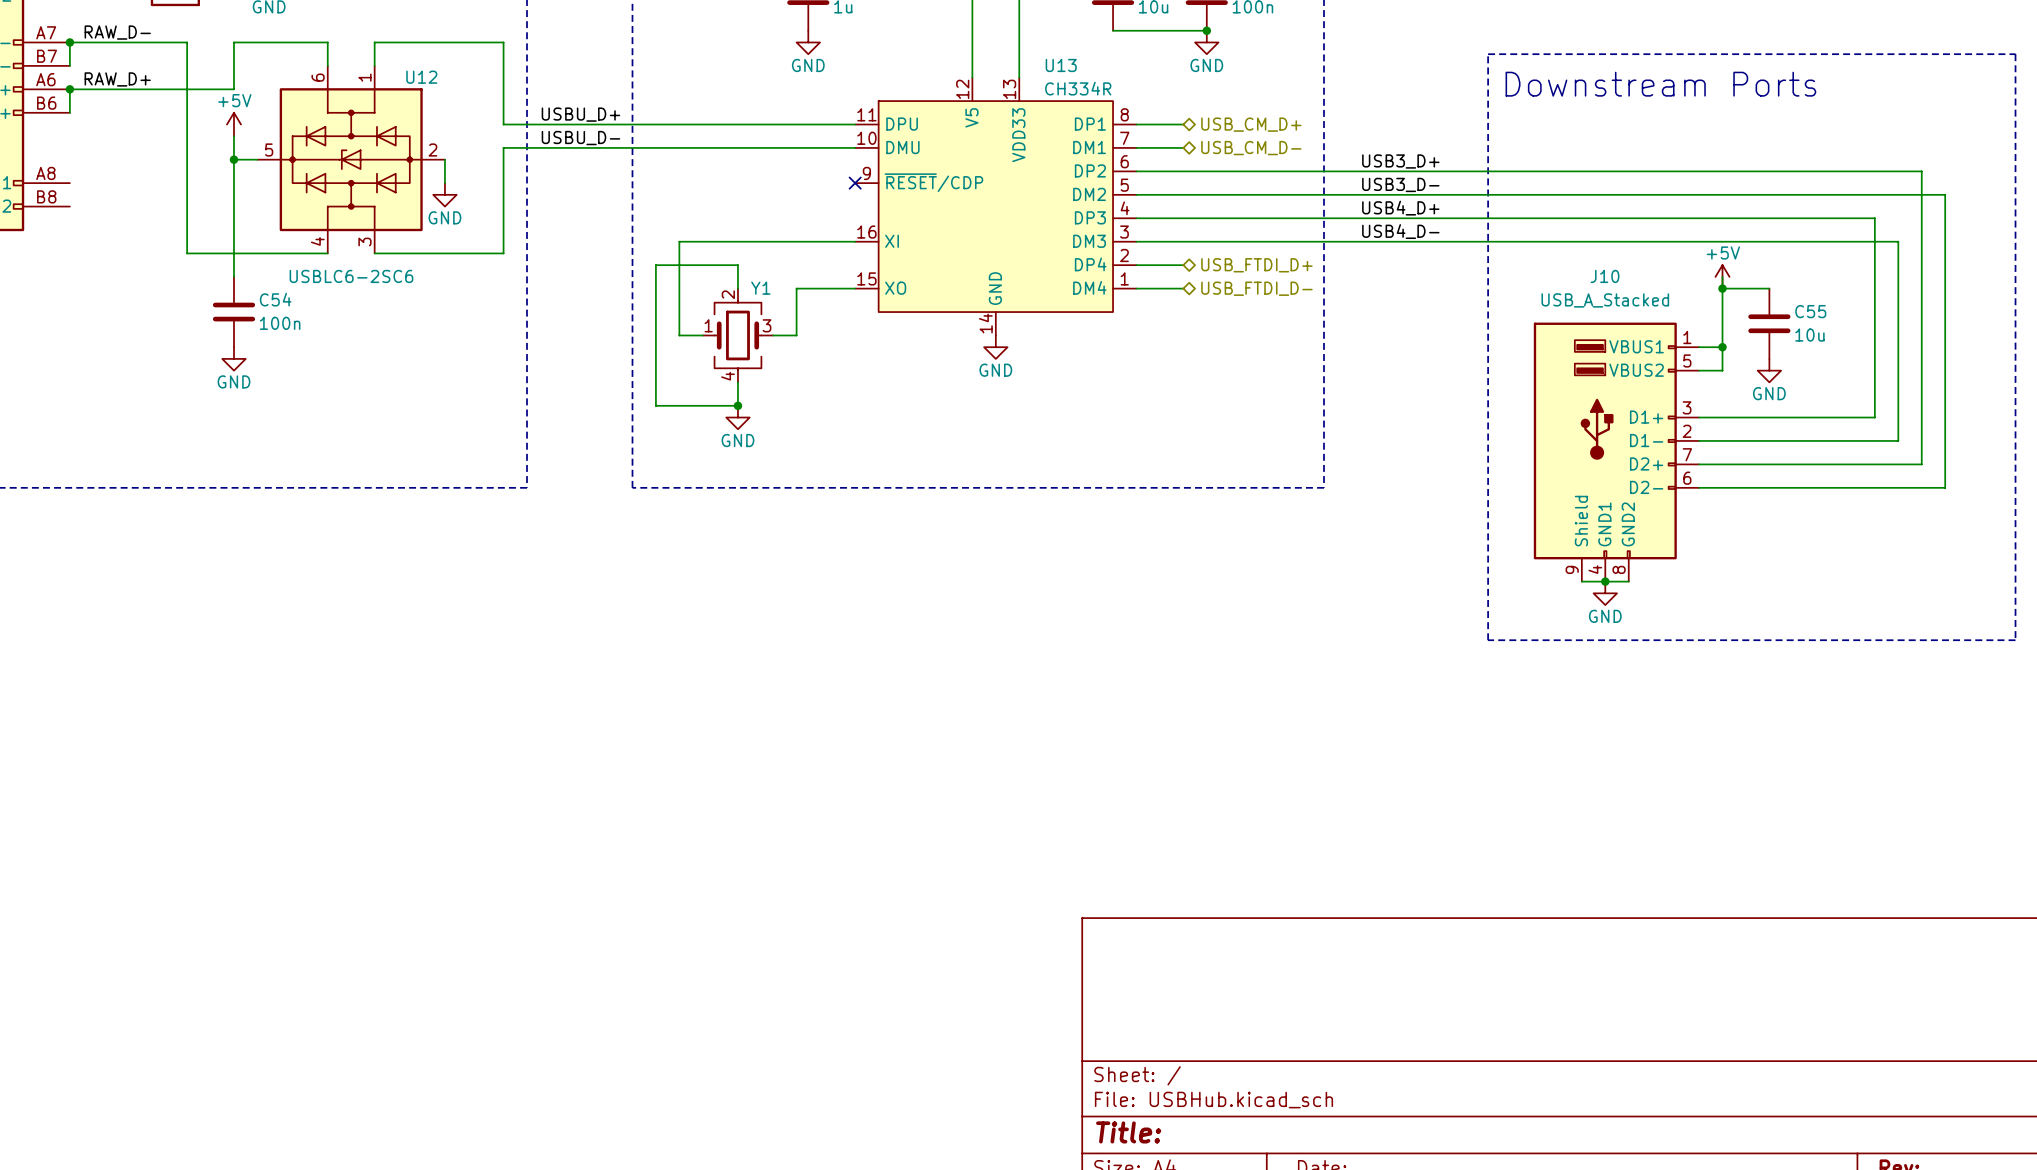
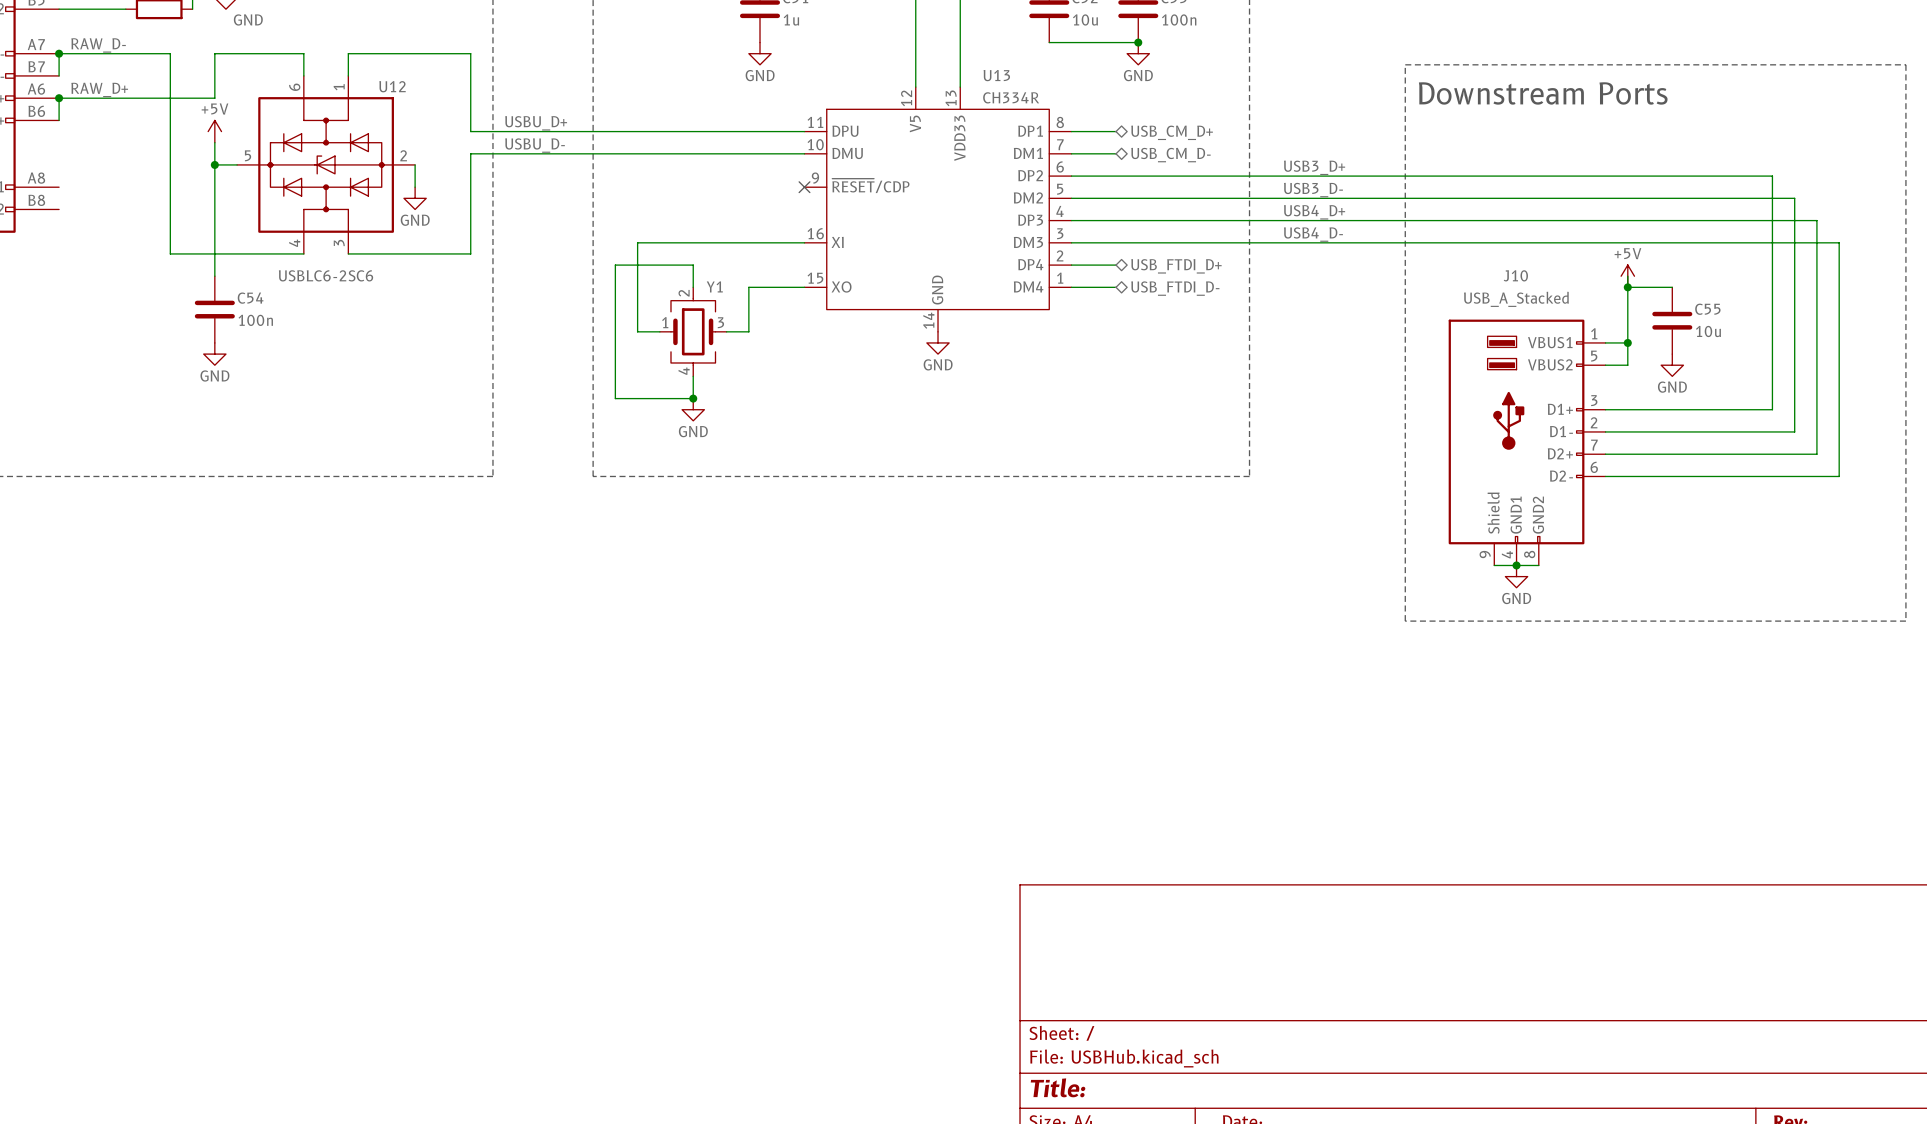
wire: (1874, 171) (1921, 171) (1921, 218) -> (1772, 176) (1772, 220) (1816, 220)
wire: (1898, 194) (1945, 194) (1945, 241) -> (1794, 198) (1794, 242) (1839, 242)

